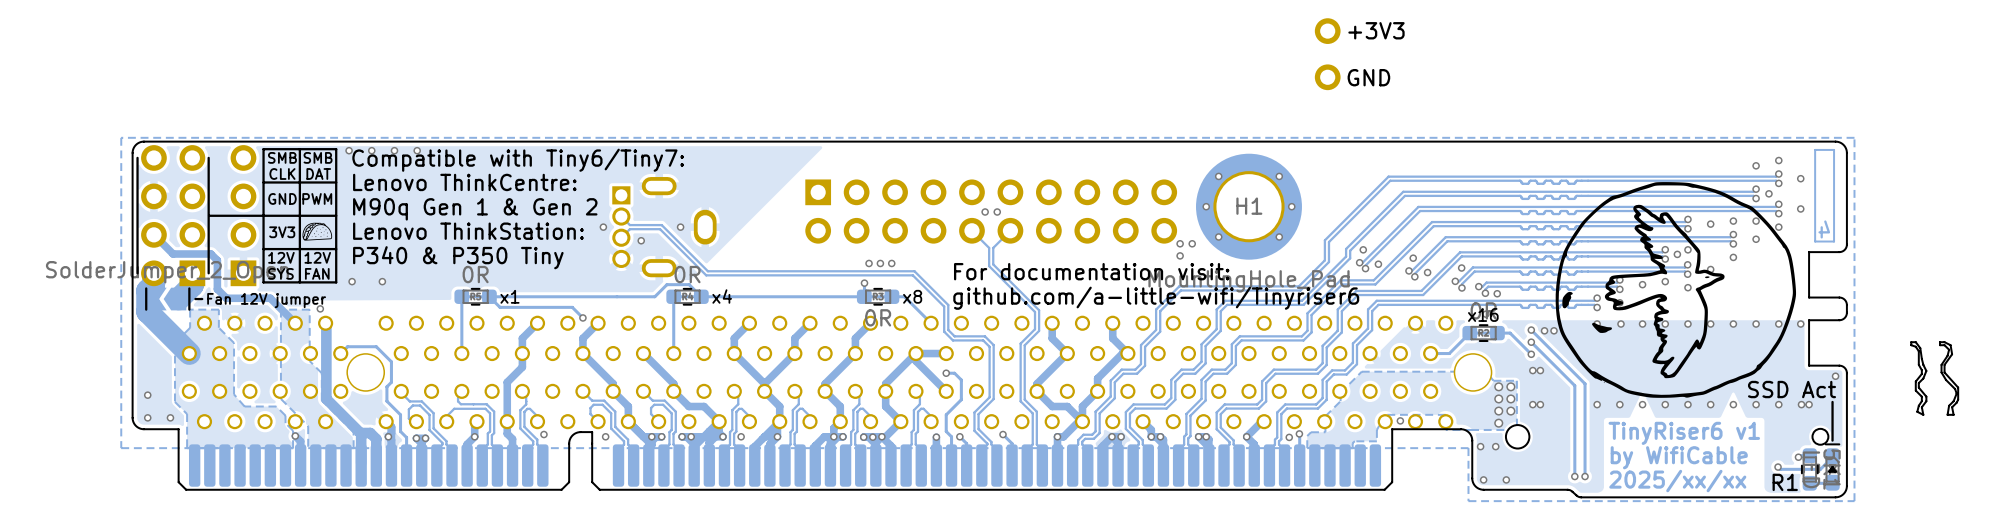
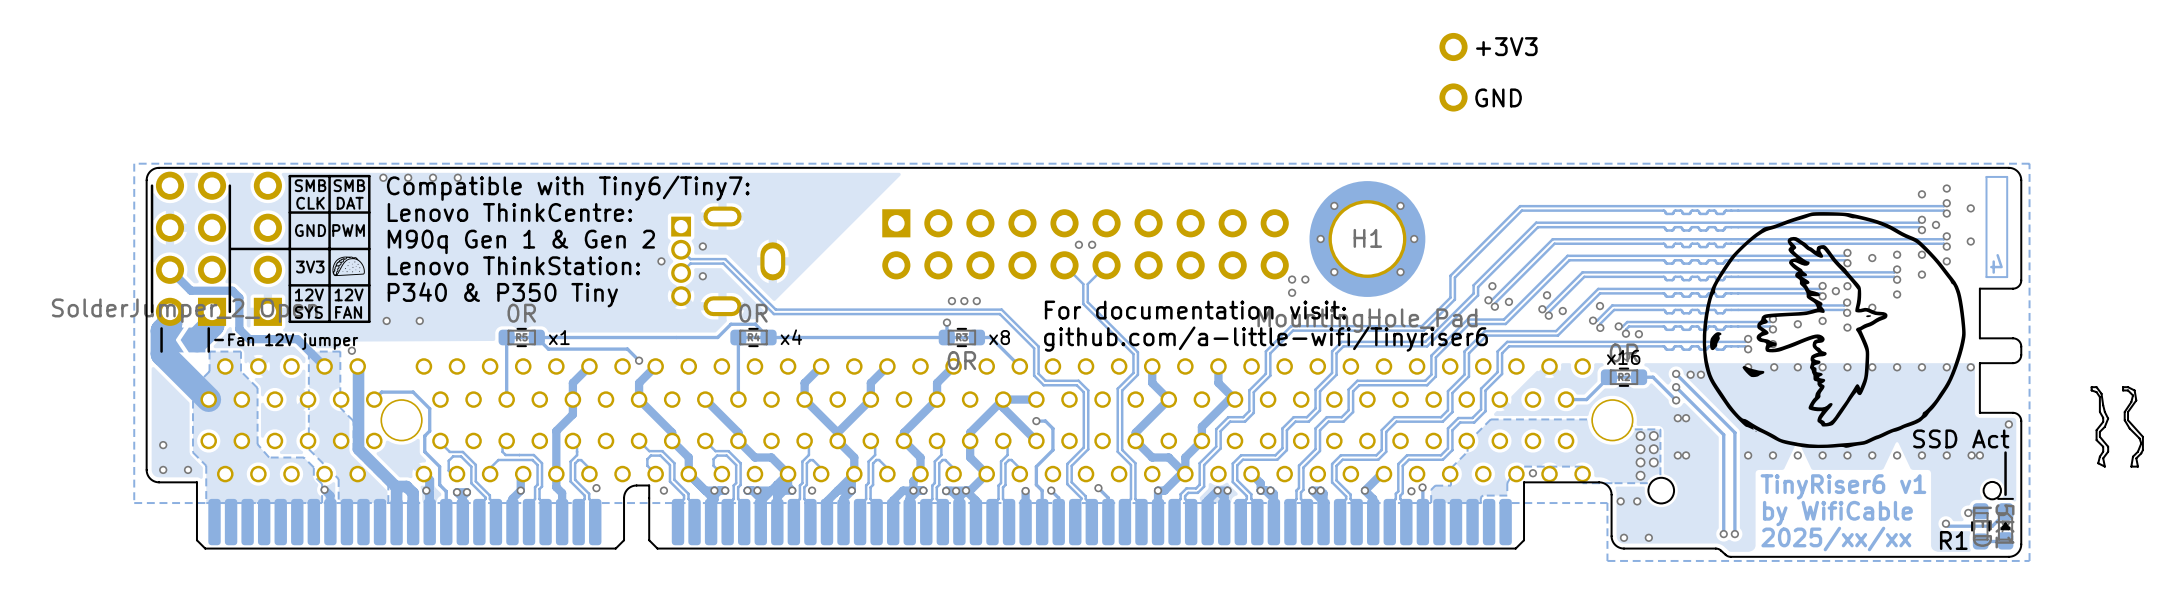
via position: (680, 227) -> (702, 246)

